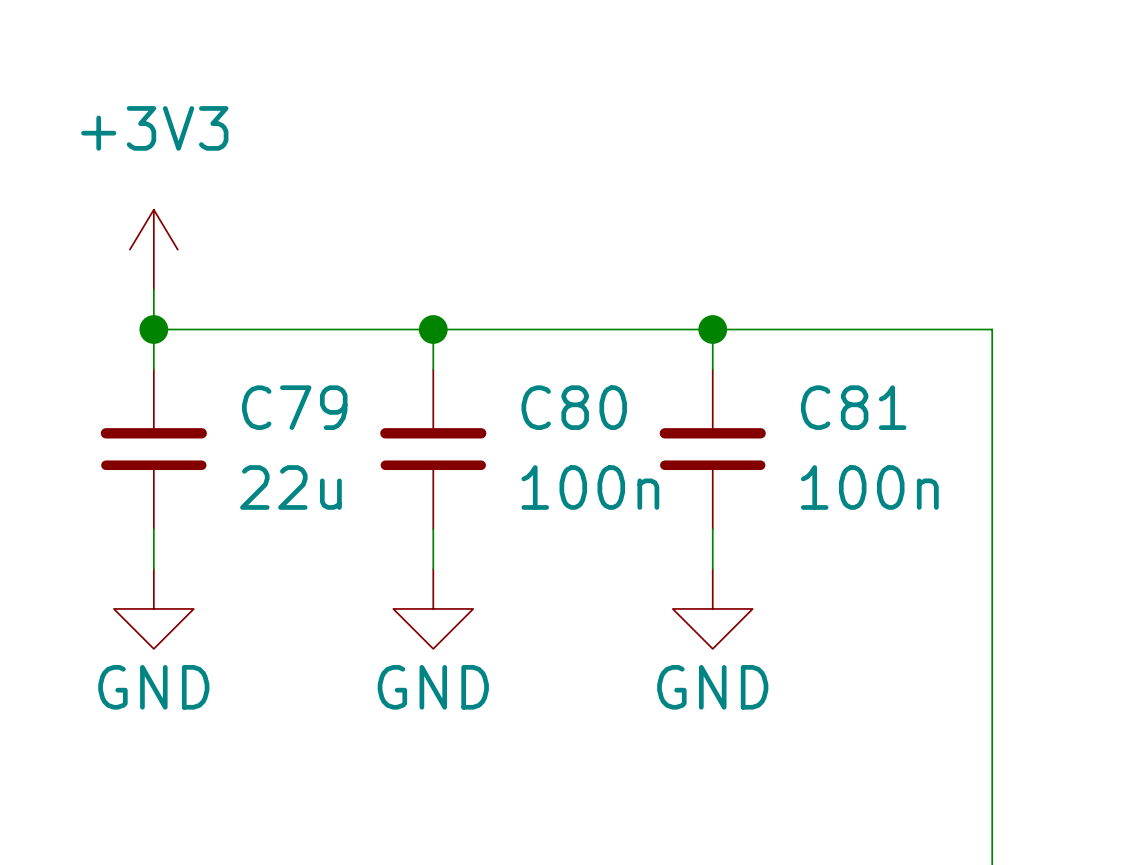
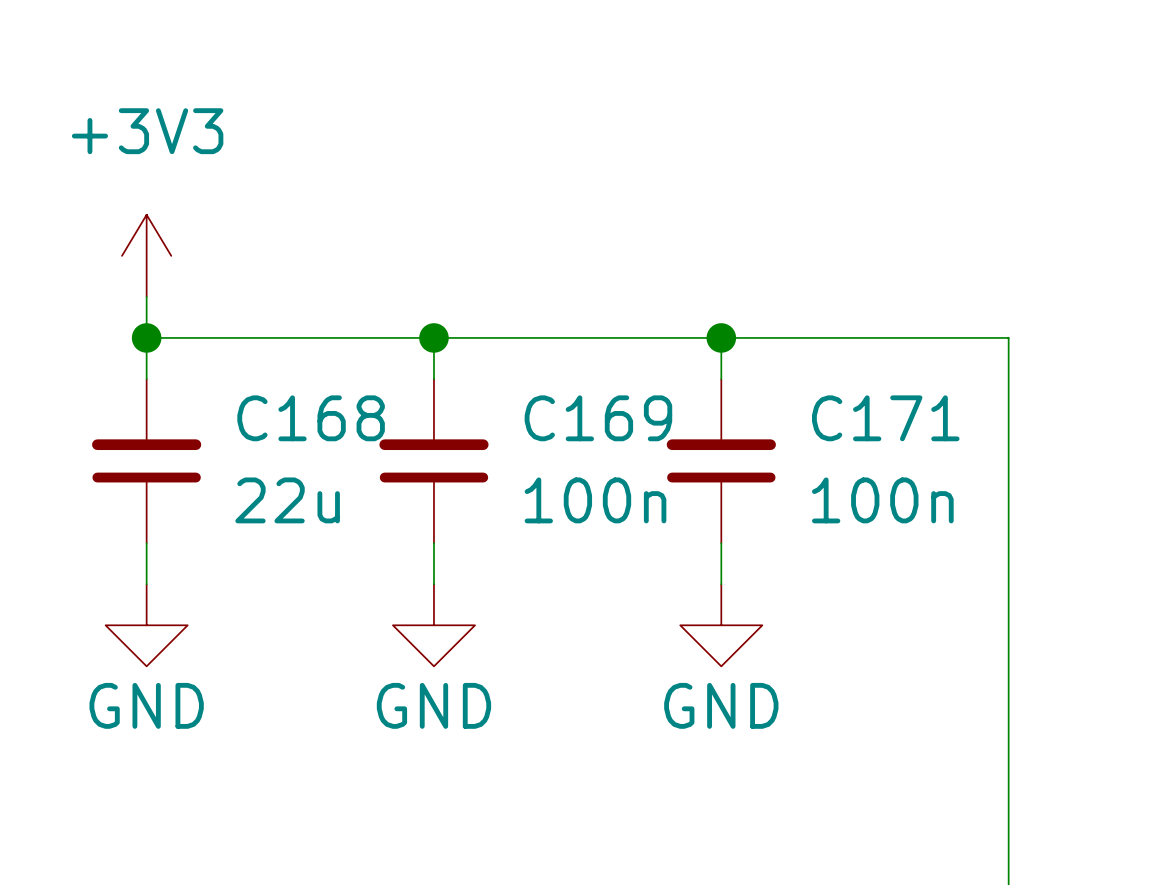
C79 name: C79 (294, 407) -> C168 (311, 418)
C80 name: C80 (574, 407) -> C169 (598, 418)
C81 name: C81 (853, 407) -> C171 (885, 418)

